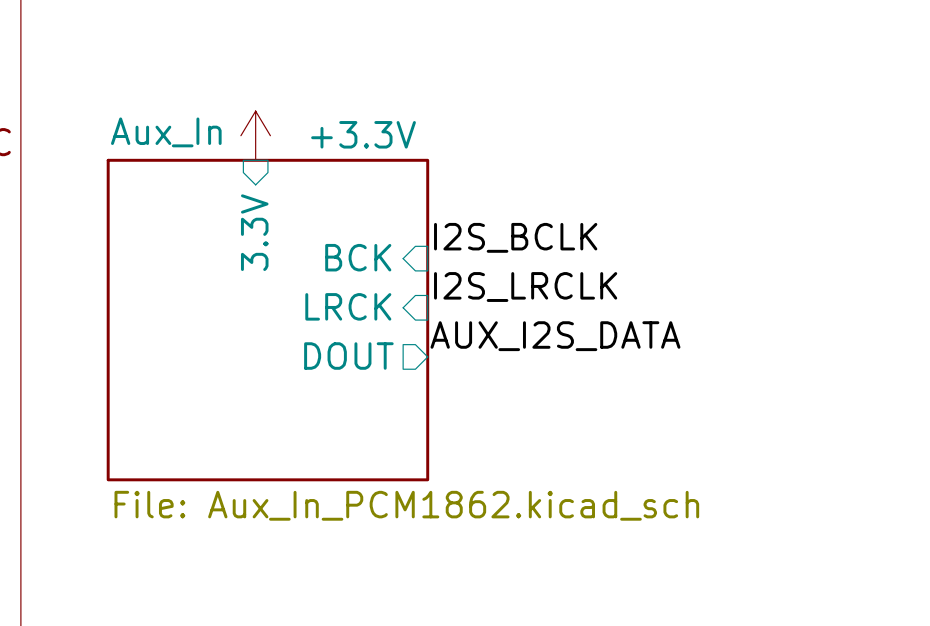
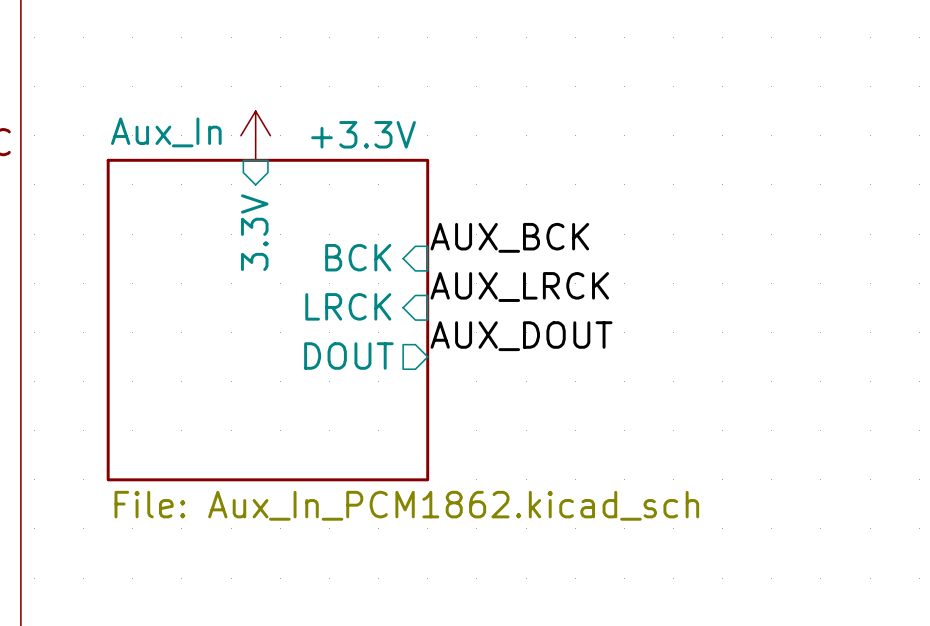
label: I2S_BCLK (515, 237) -> AUX_BCK (509, 237)
label: I2S_LRCLK (525, 287) -> AUX_LRCK (519, 287)
label: AUX_I2S_DATA (555, 336) -> AUX_DOUT (521, 336)

